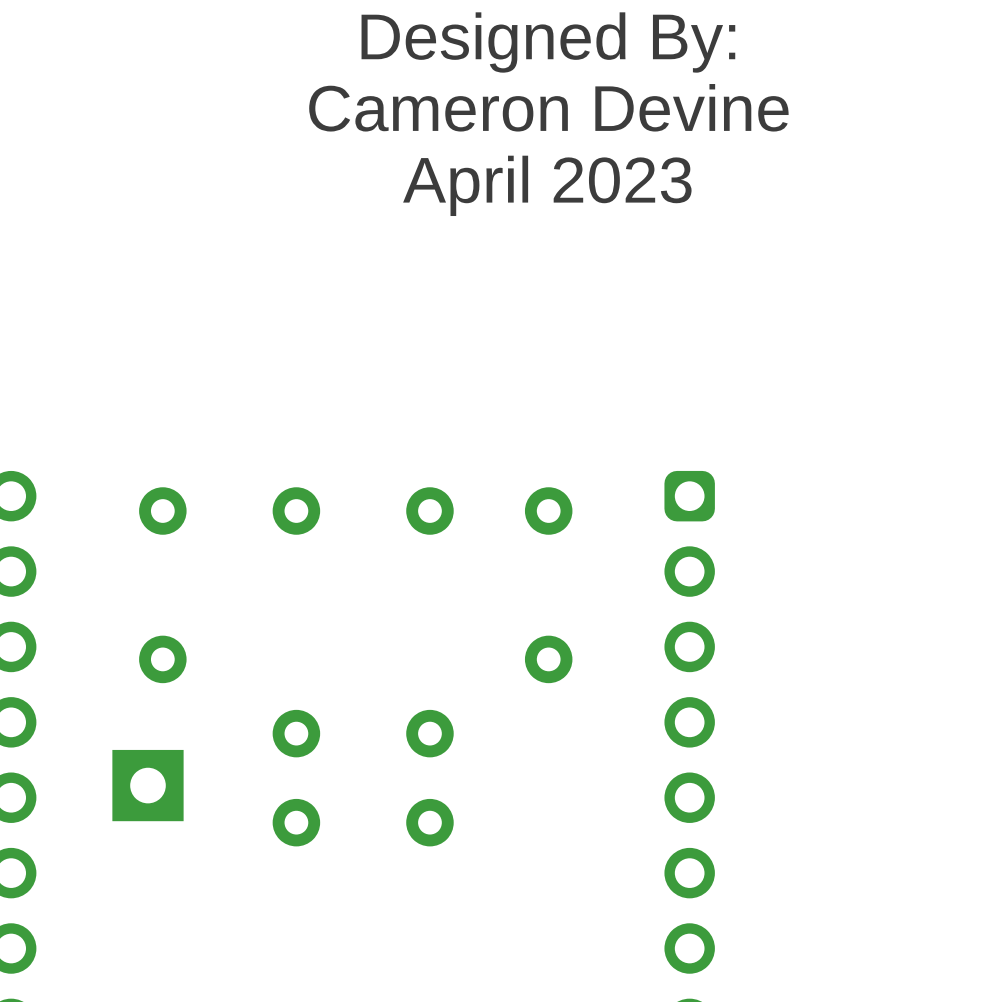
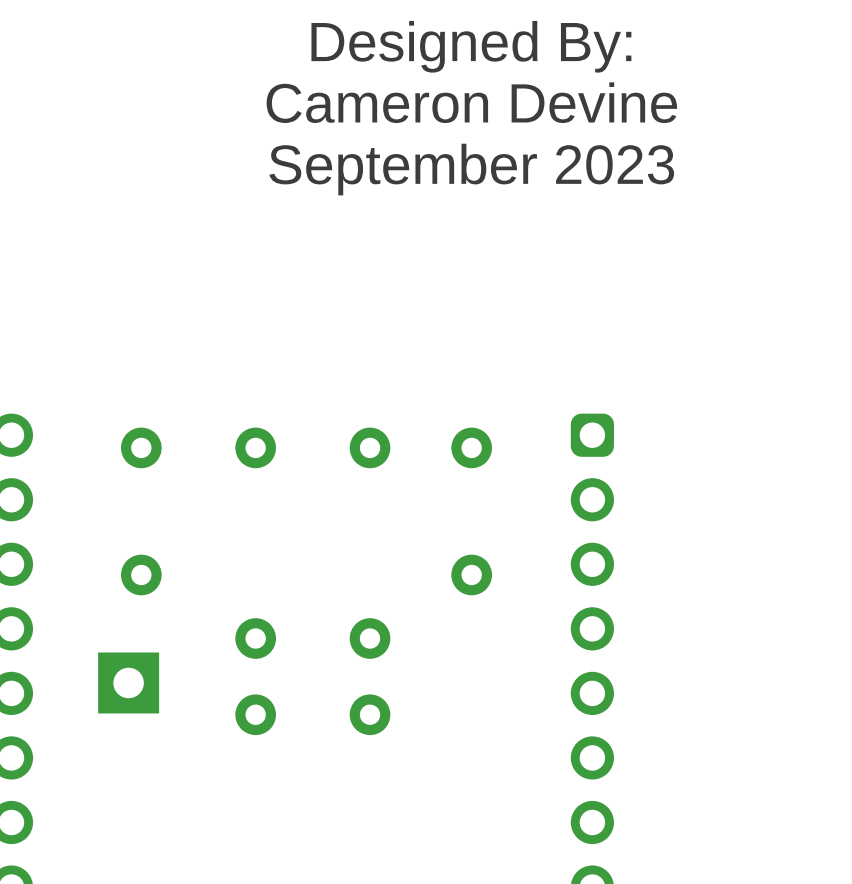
text: April 2023 (547, 185) -> September 2023 (471, 169)

